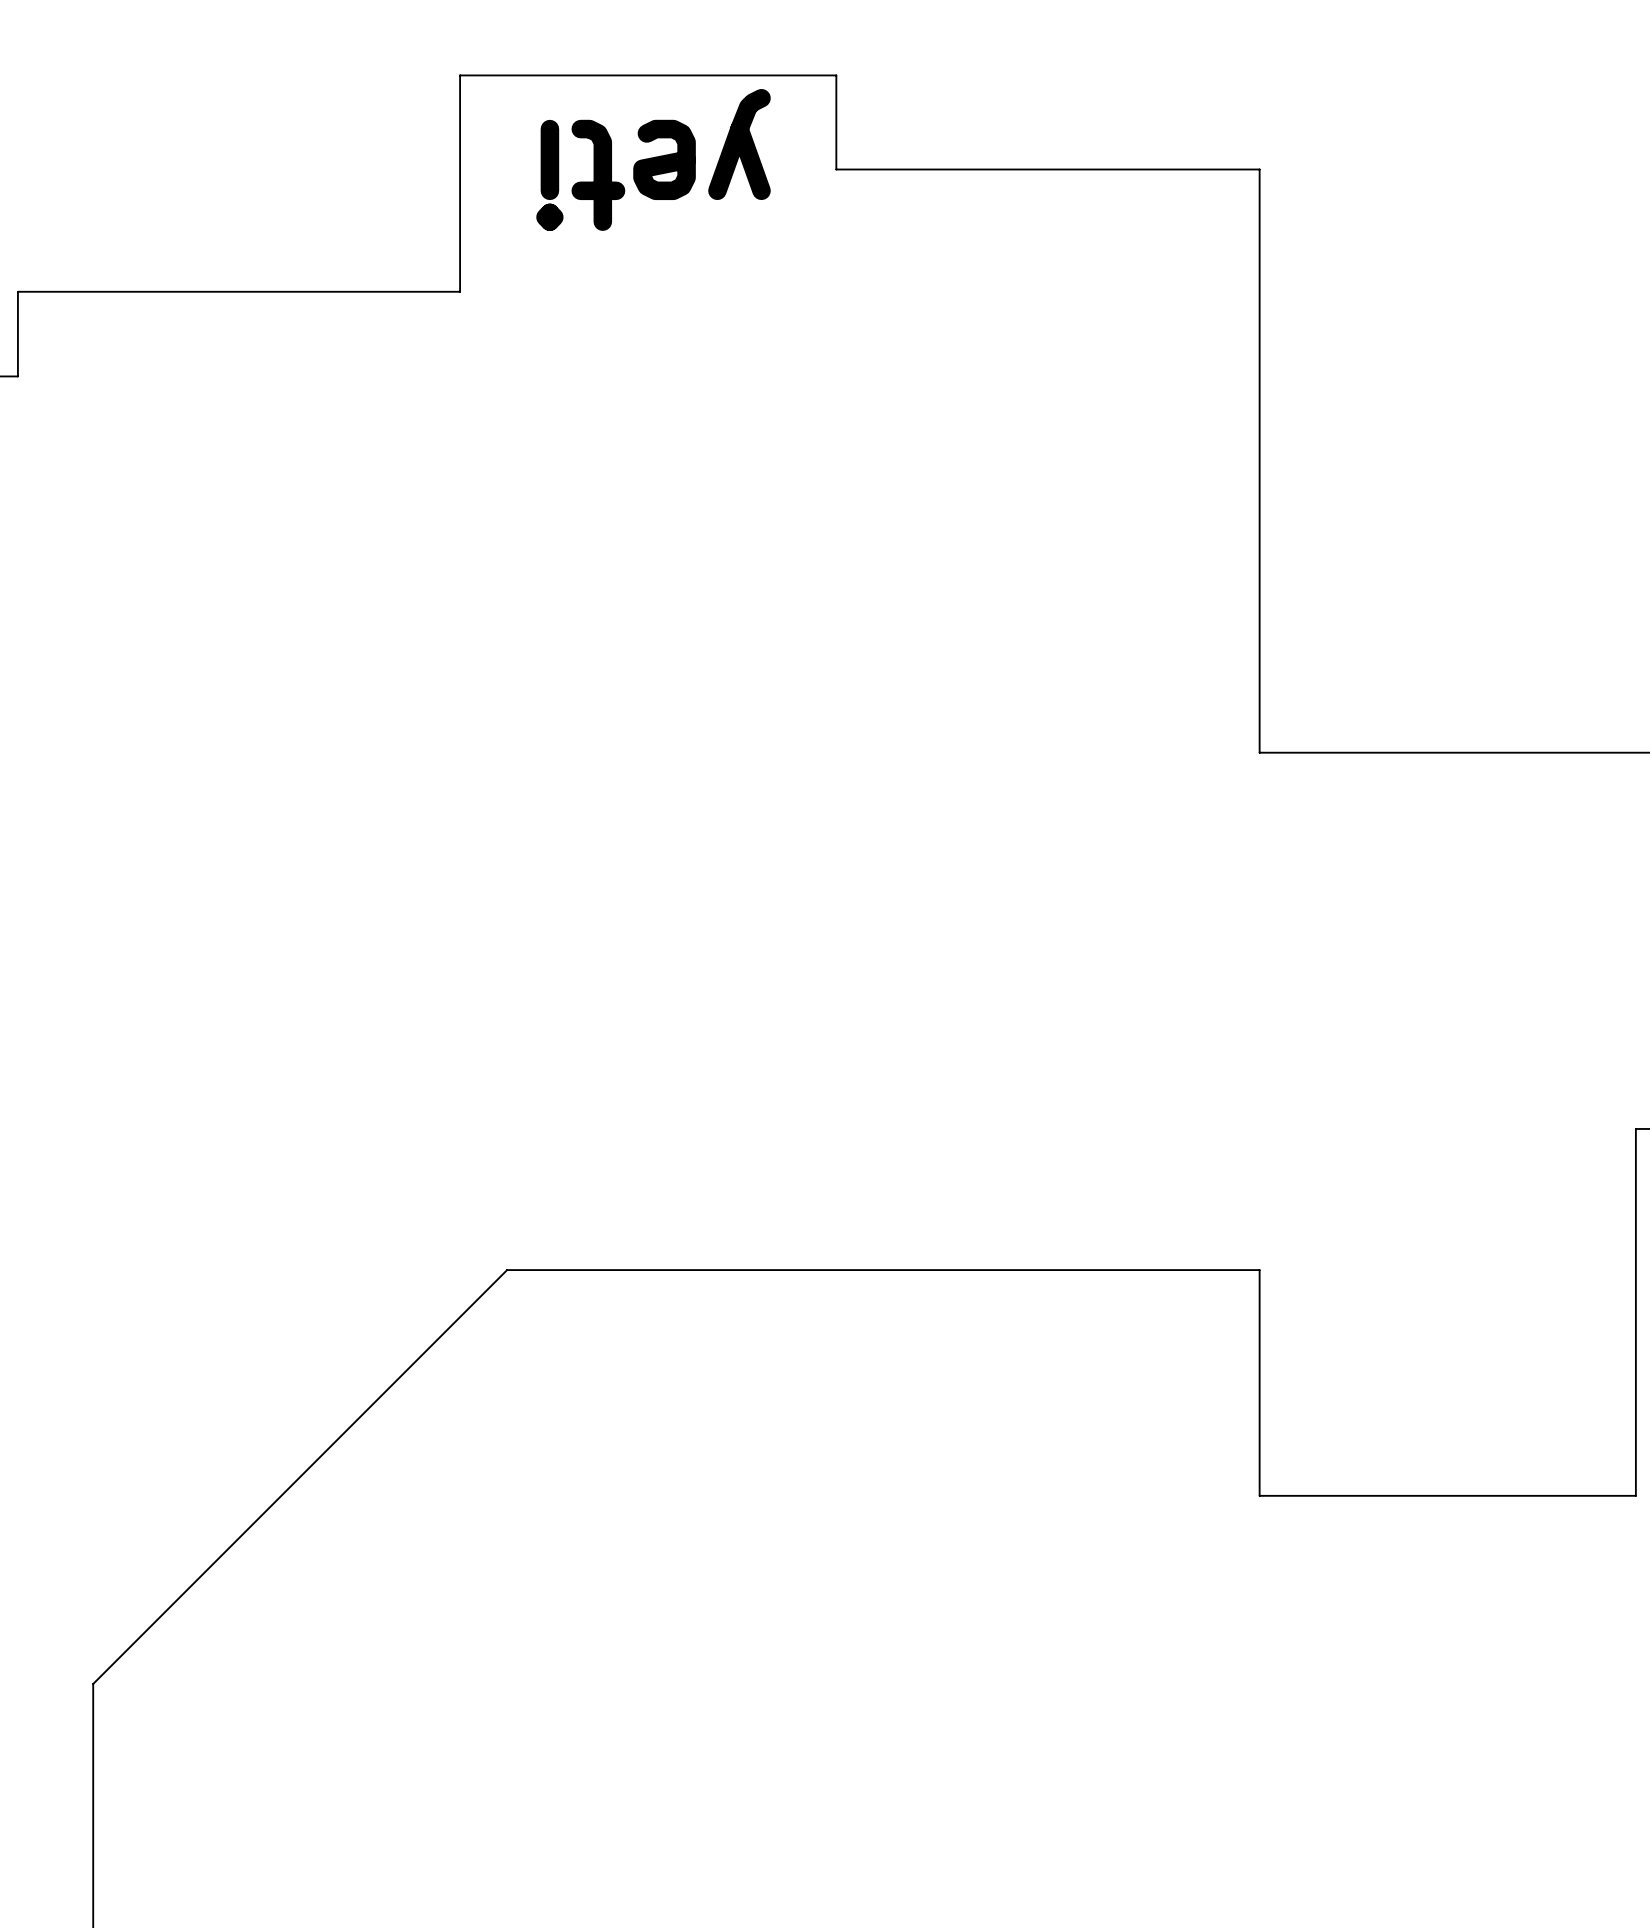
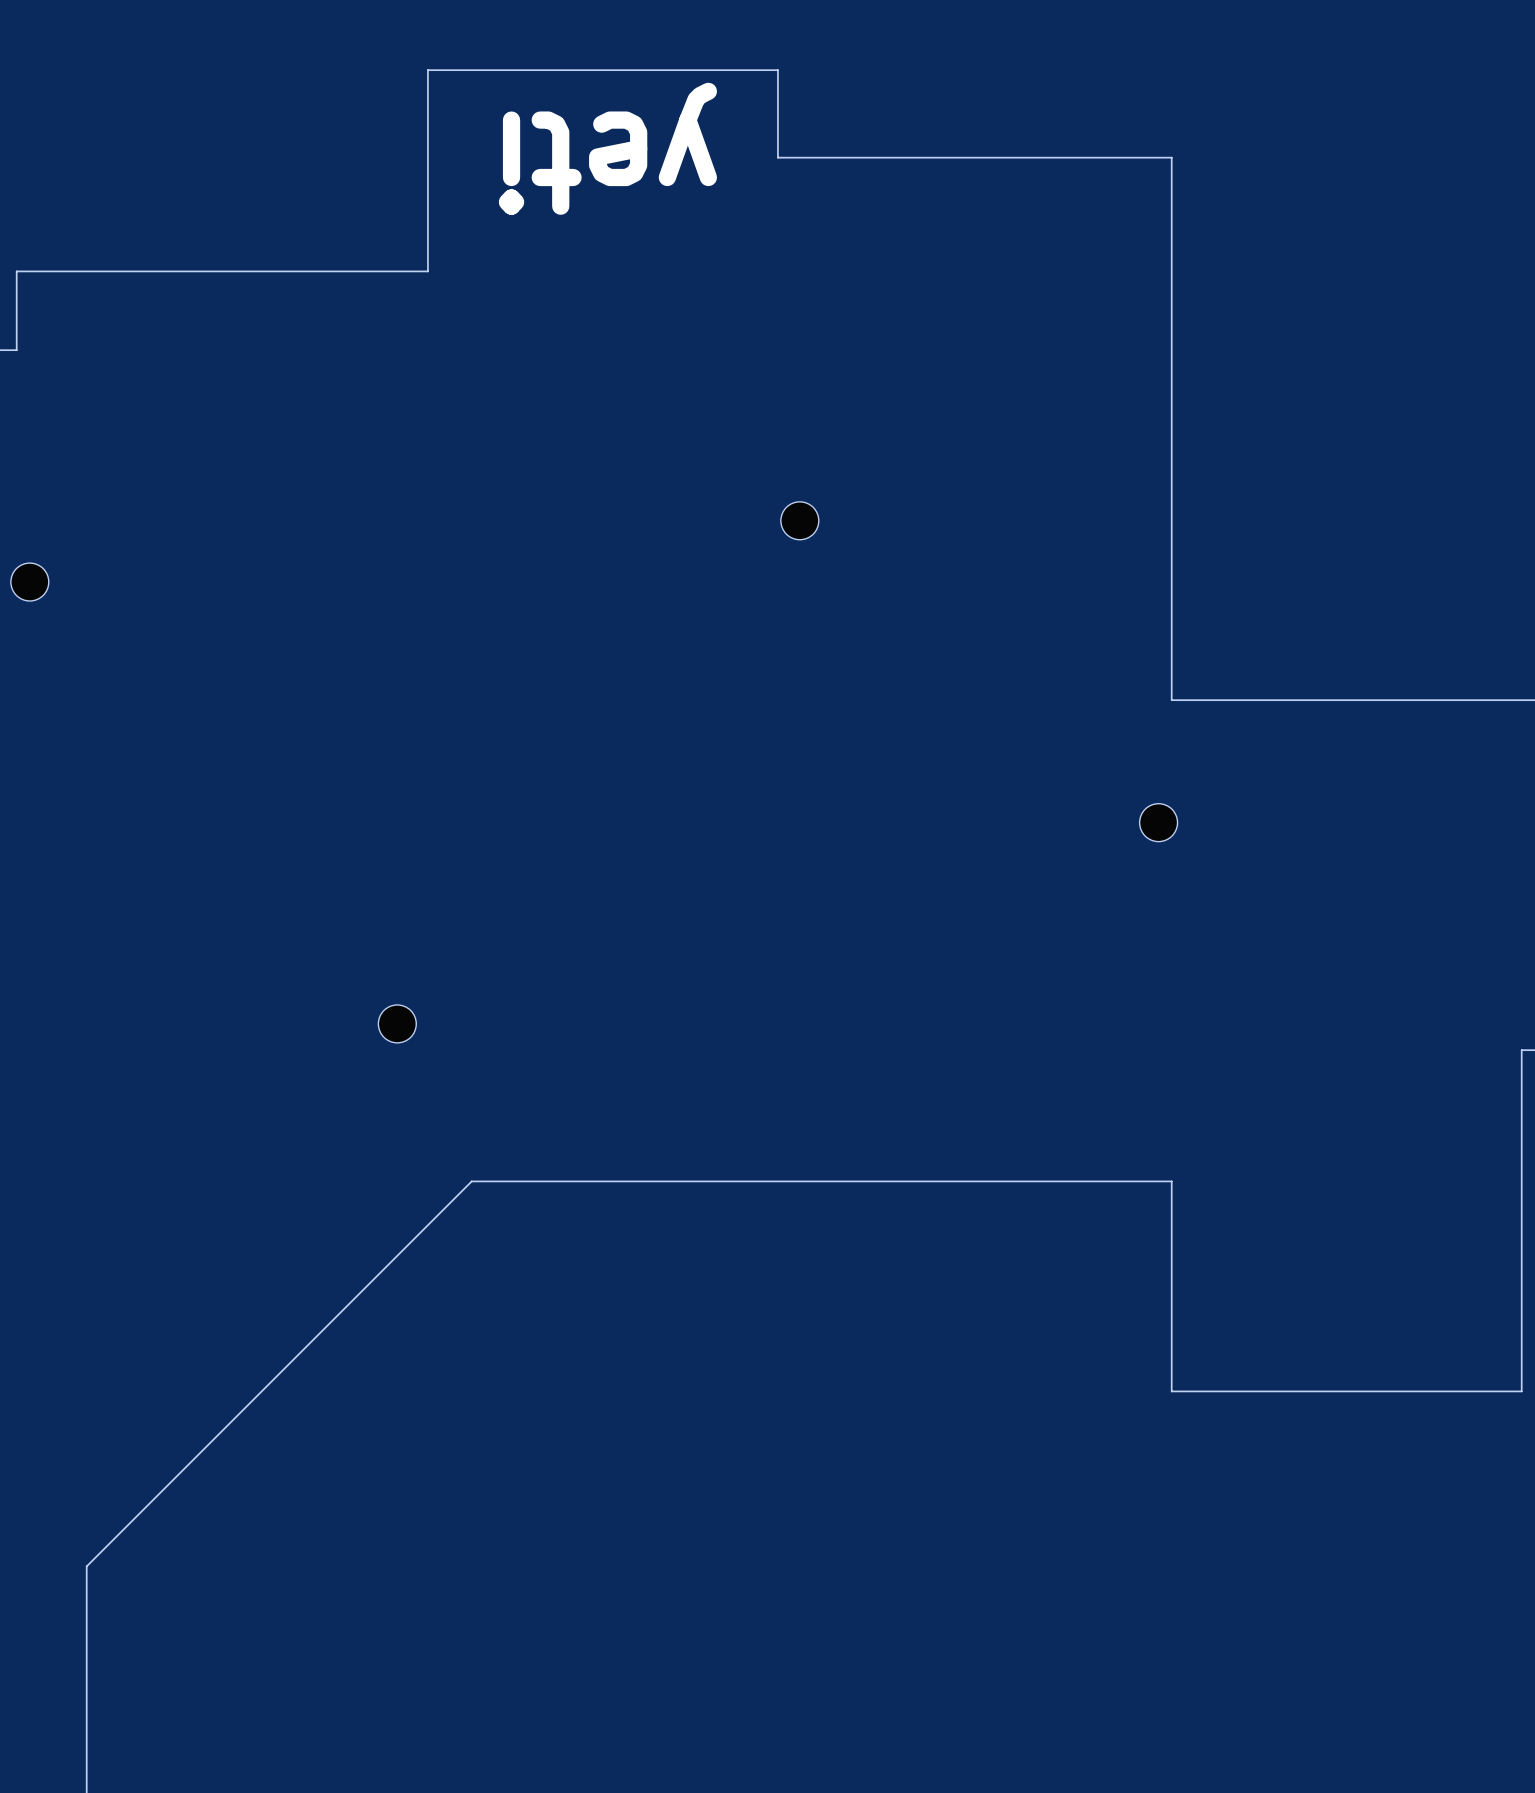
part: none -> (799, 520)
part: none -> (29, 582)
part: none -> (1158, 822)
part: none -> (397, 1023)

